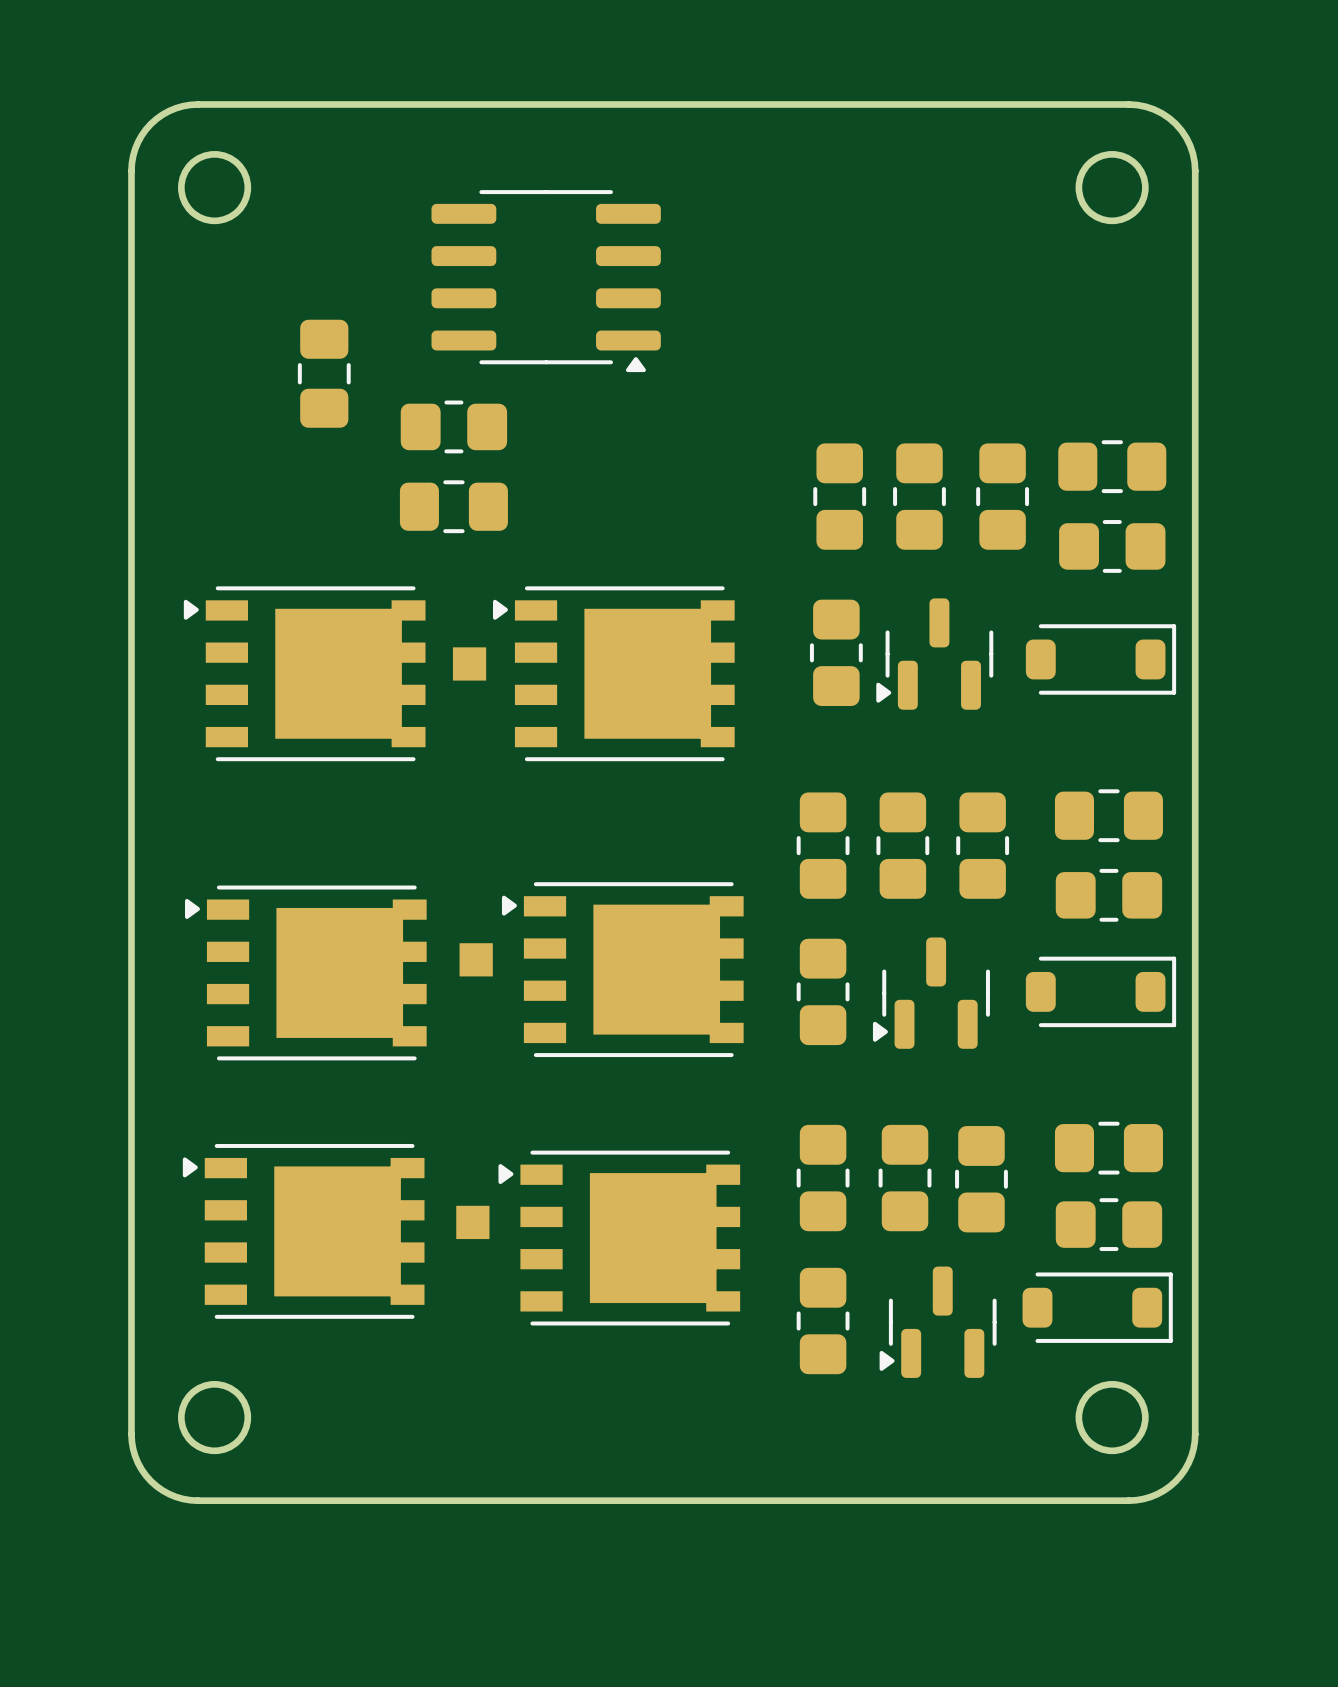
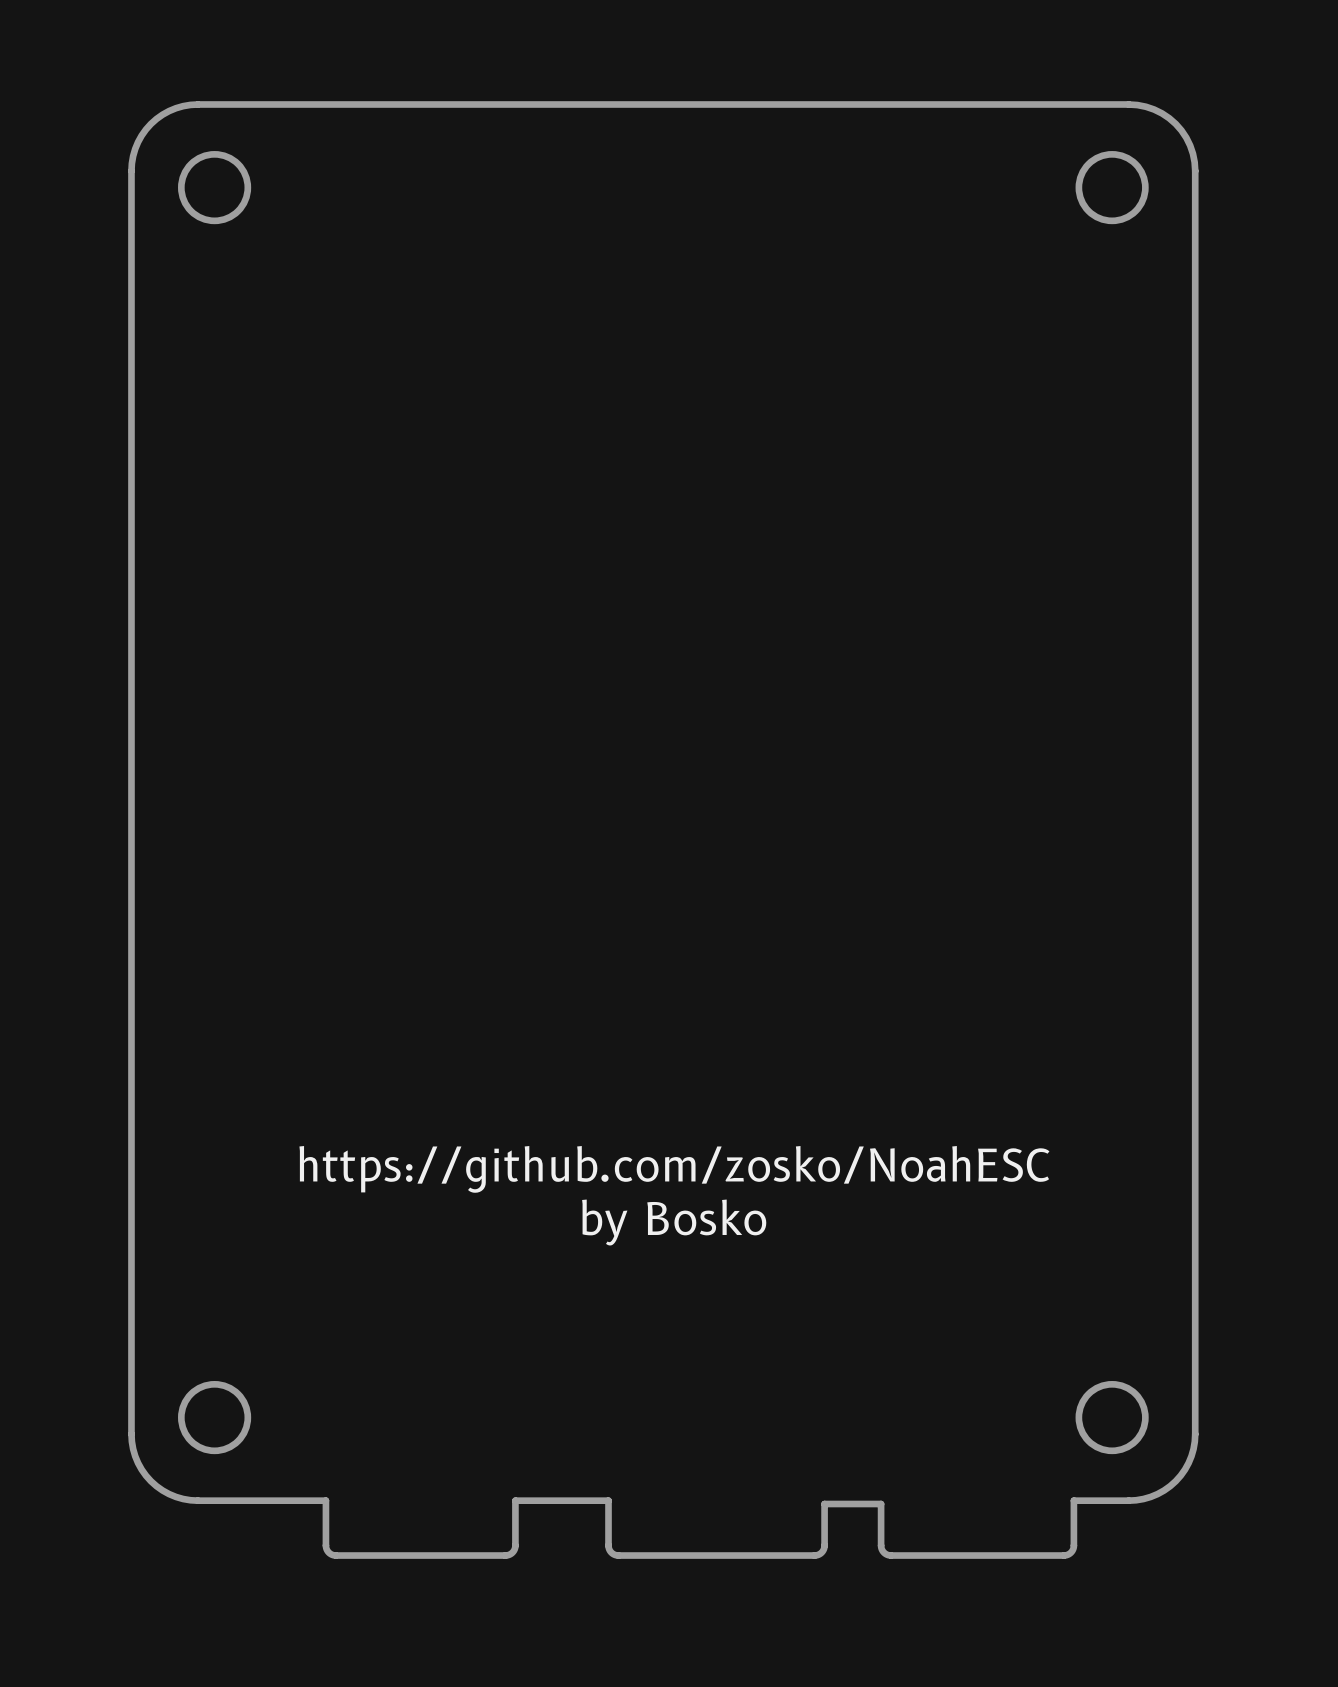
part: (546, 281) -> none
part: (324, 373) -> none
part: (453, 426) -> none
part: (1112, 466) -> none
part: (839, 496) -> none
part: (919, 496) -> none
part: (1002, 496) -> none
part: (453, 506) -> none
part: (1112, 546) -> none
part: (836, 652) -> none
part: (934, 654) -> none
part: (1100, 659) -> none
part: (469, 663) -> none
part: (304, 673) -> none
part: (613, 673) -> none
part: (1108, 815) -> none
part: (823, 845) -> none
part: (902, 845) -> none
part: (982, 845) -> none
part: (1108, 895) -> none
part: (476, 959) -> none
part: (622, 969) -> none
part: (305, 972) -> none
part: (823, 991) -> none
part: (1100, 991) -> none
part: (931, 993) -> none
part: (1108, 1148) -> none
text: none -> https://github.com/zosko/NoahESC (674, 1169)
part: (823, 1178) -> none
part: (905, 1178) -> none
part: (981, 1179) -> none
part: (472, 1222) -> none
text: none -> by Bosko (674, 1222)
part: (1108, 1224) -> none
part: (303, 1231) -> none
part: (619, 1238) -> none
part: (1097, 1307) -> none
part: (823, 1321) -> none
part: (938, 1322) -> none
board edge: (515, 1500) (325, 1500) -> (515, 1500) (515, 1546) (512, 1552) (505, 1555) (333, 1555) (328, 1551) (326, 1546) (325, 1500)
board edge: (1073, 1500) (608, 1500) -> (1073, 1500) (1073, 1546) (1070, 1552) (1063, 1555) (888, 1555) (883, 1551) (881, 1546) (881, 1504) (824, 1504) (824, 1546) (821, 1552) (815, 1555) (617, 1555) (611, 1552) (608, 1546) (608, 1500)

